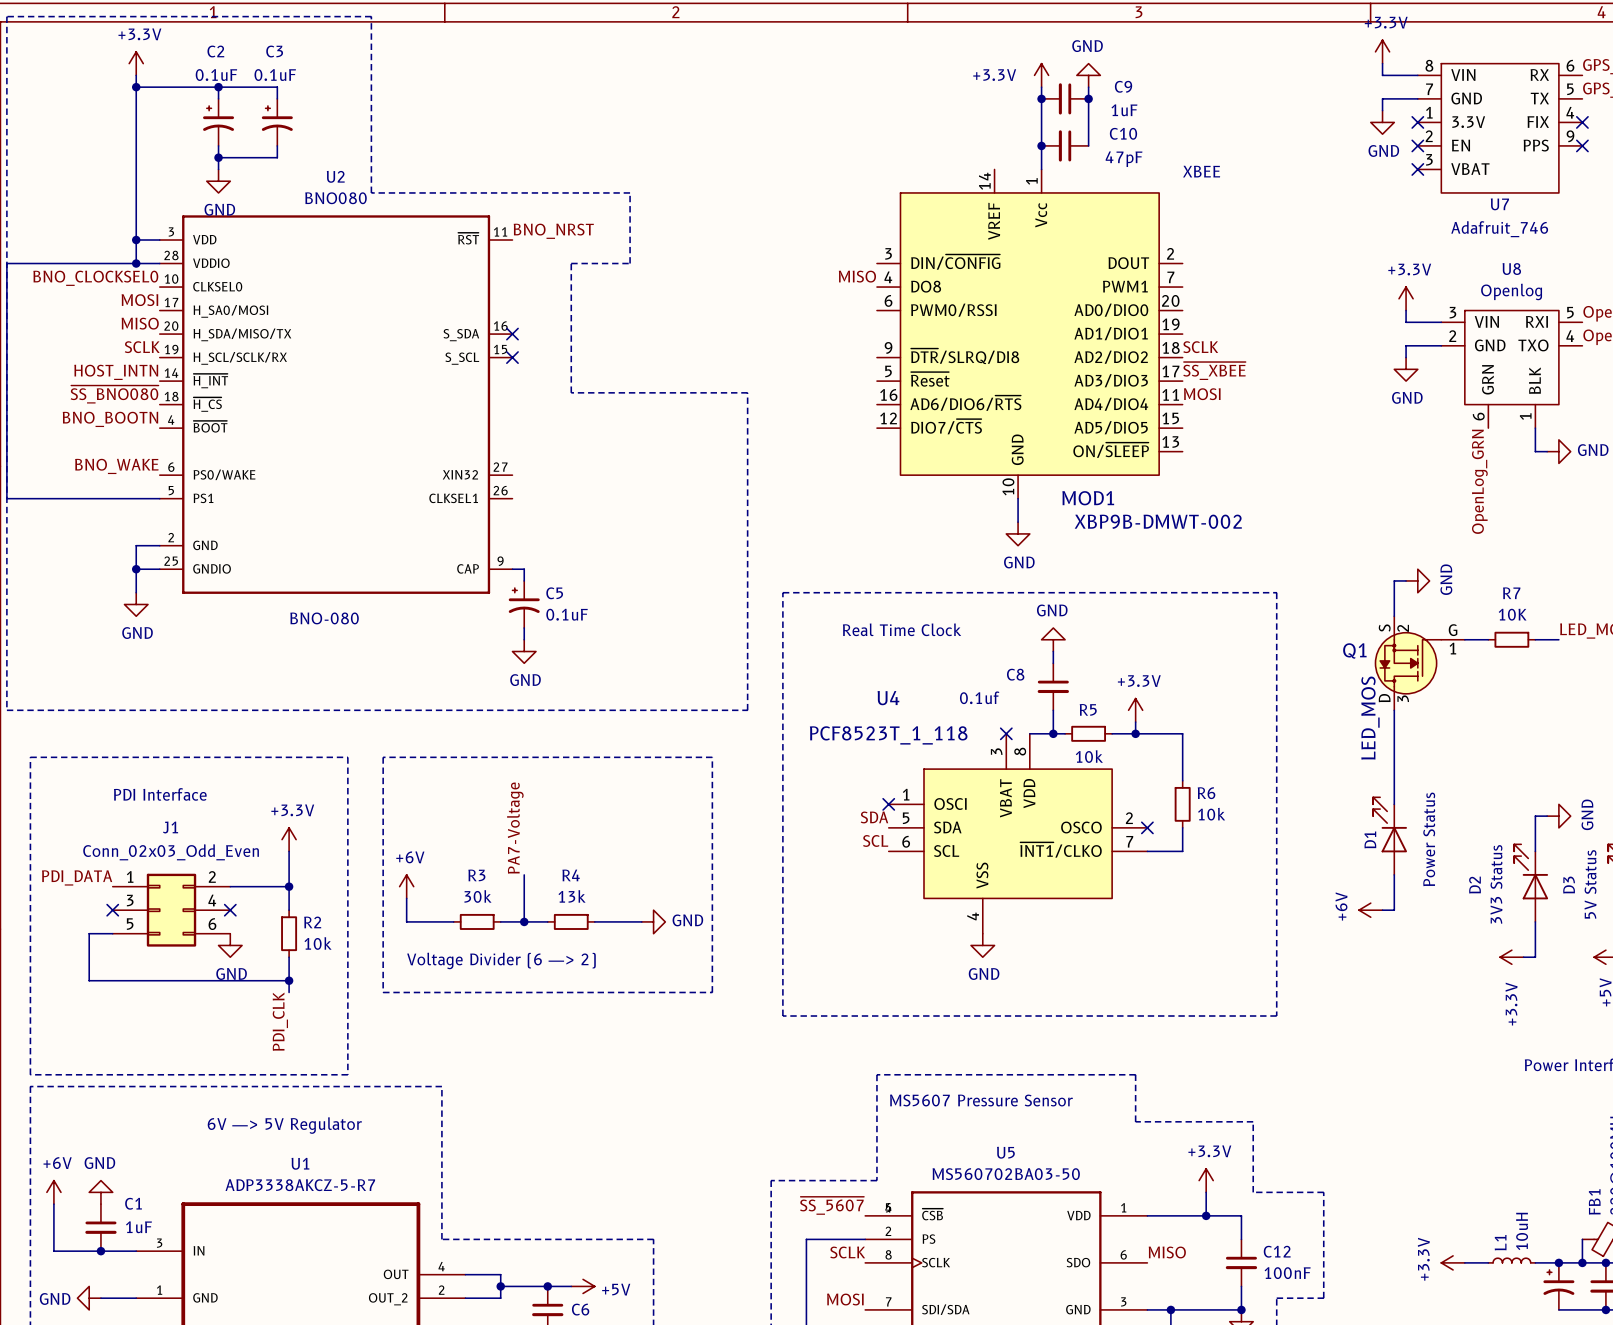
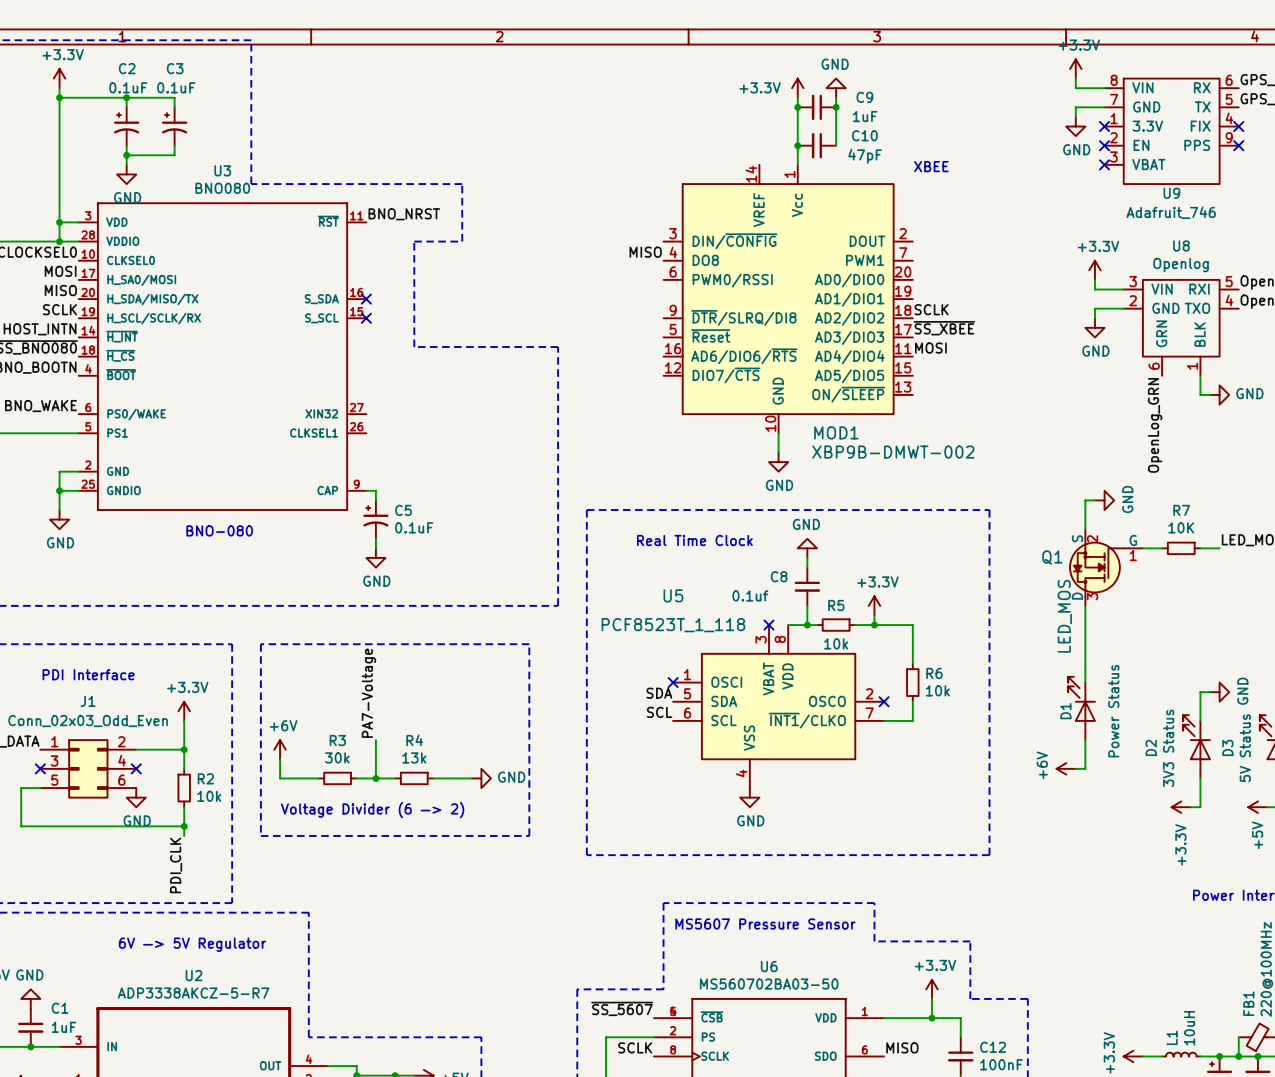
U2 name: U2 (335, 176) -> U3 (222, 170)
U7 name: U7 (1499, 204) -> U9 (1171, 193)
U4 name: U4 (888, 698) -> U5 (673, 595)
U5 name: U5 (1005, 1152) -> U6 (769, 966)
U1 name: U1 (300, 1163) -> U2 (194, 975)

